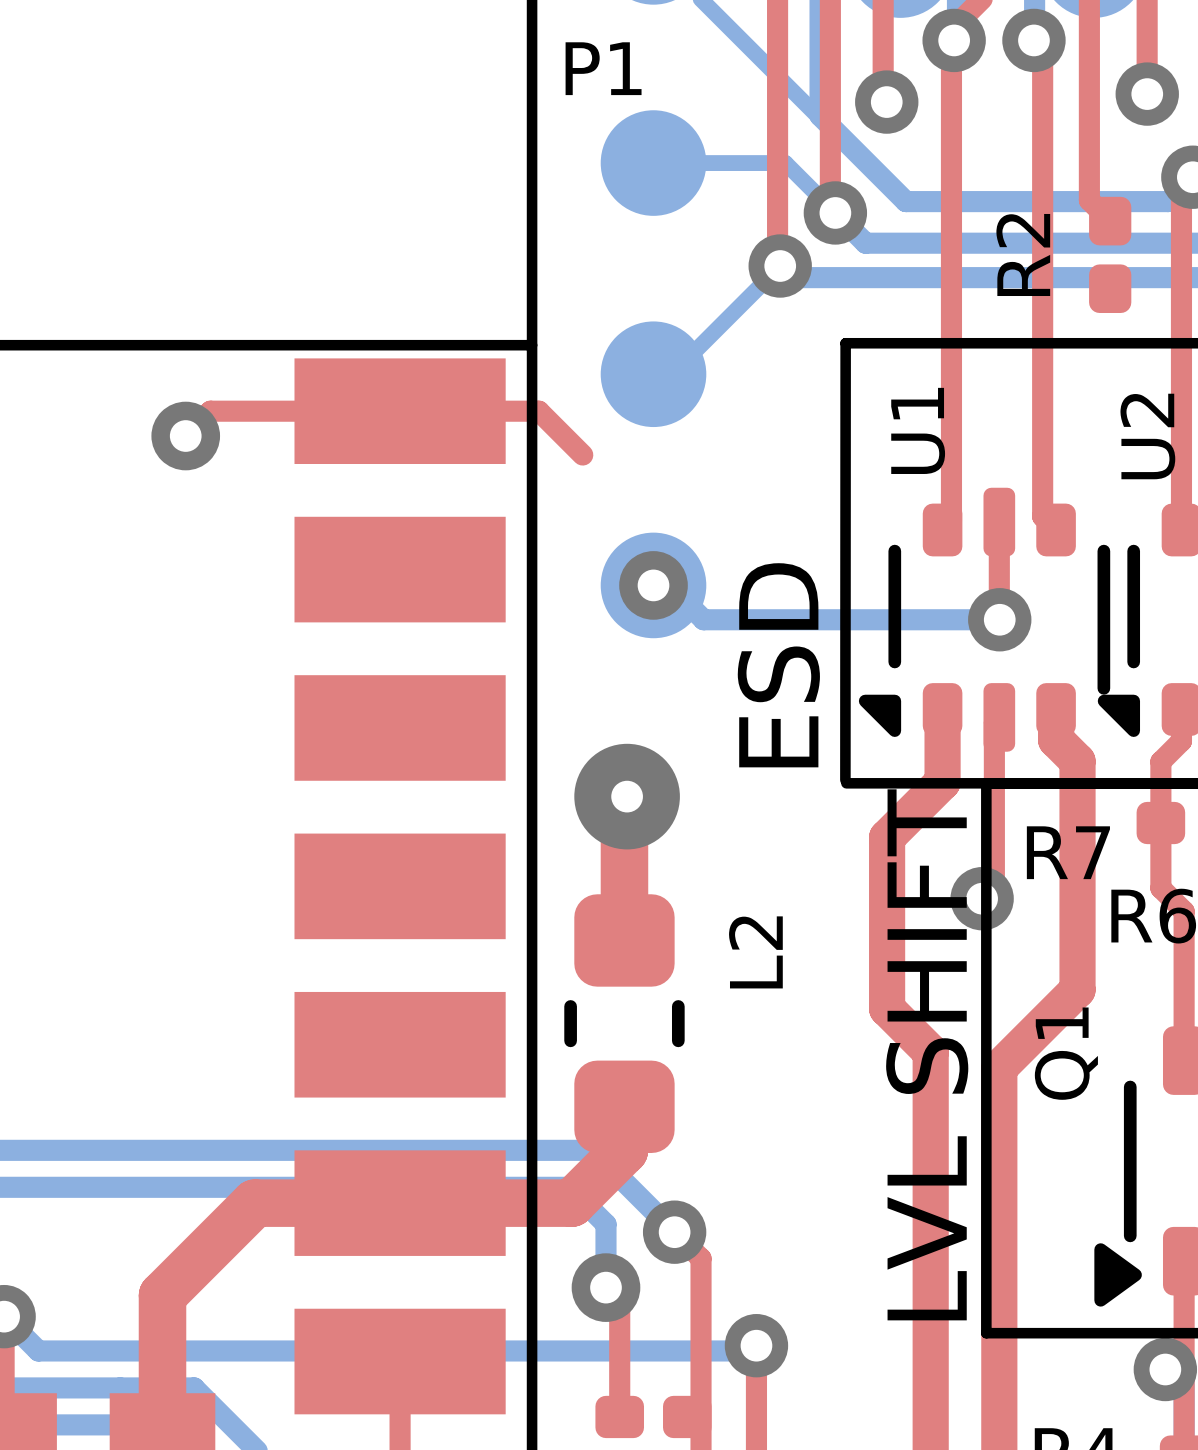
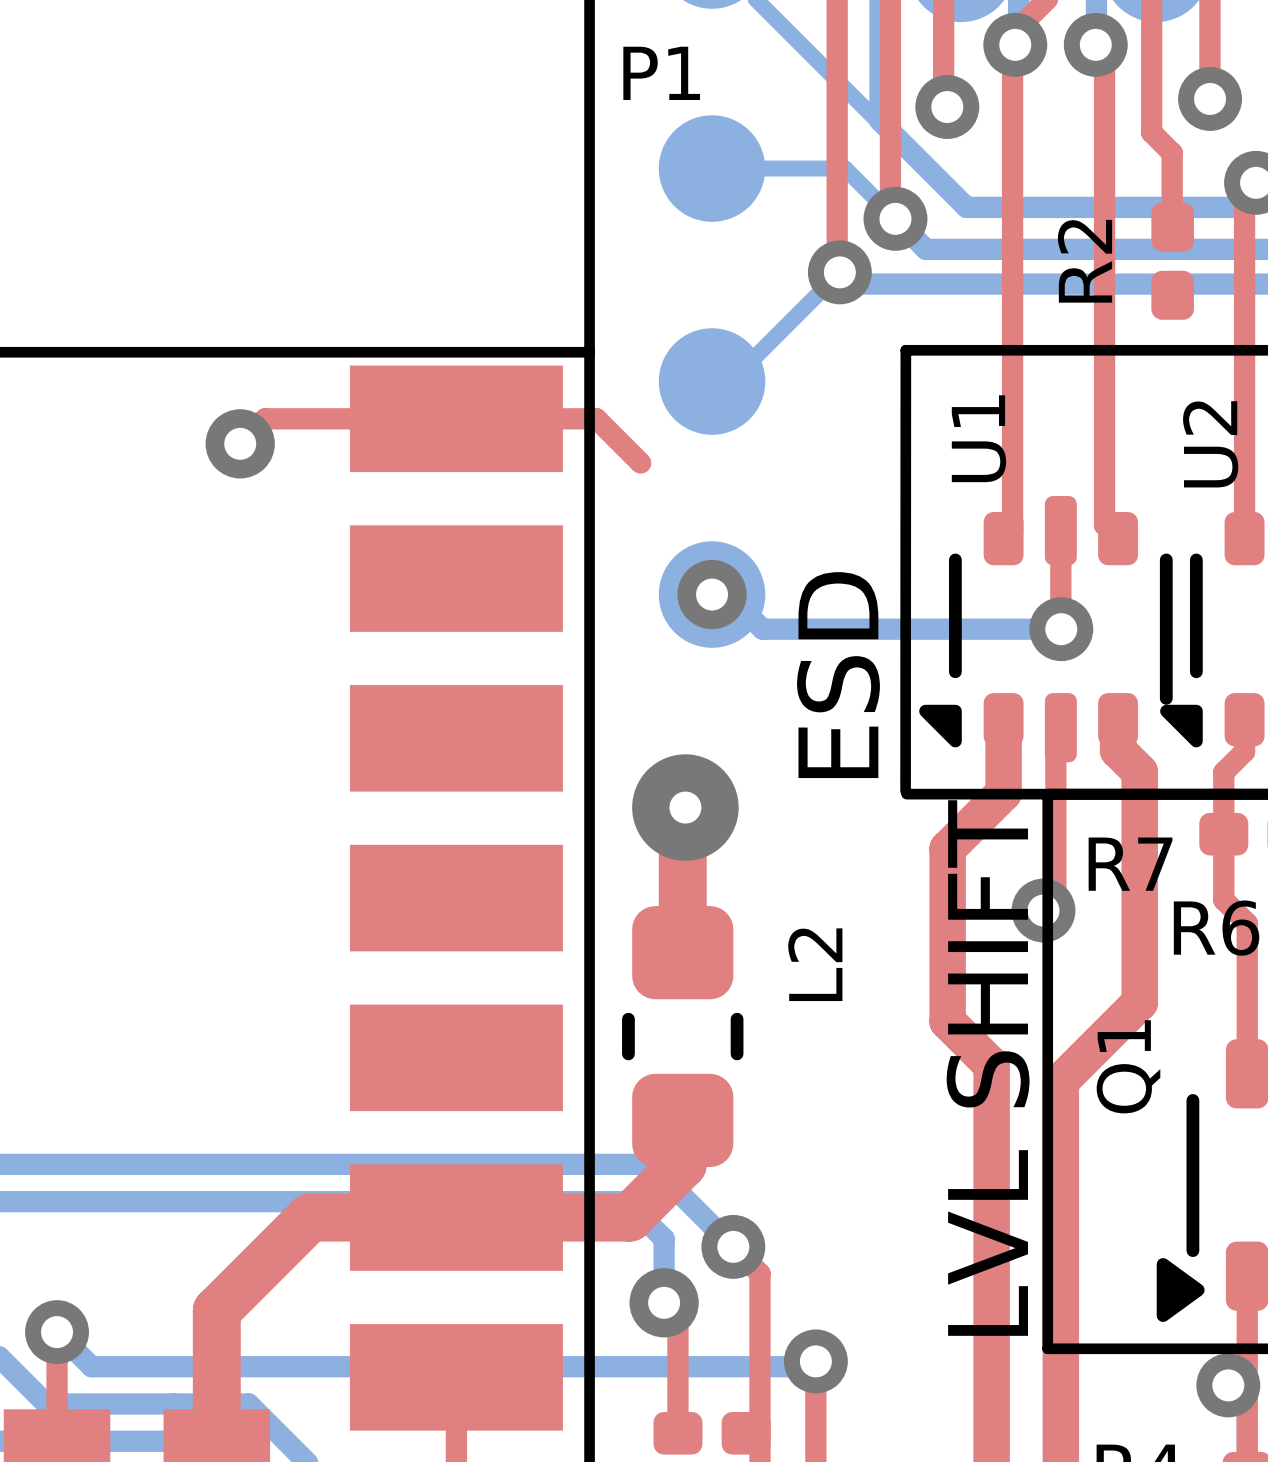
top track: (1089, 127) (1089, 200) (1109, 220) -> (1151, 132) (1172, 153) (1172, 226)

